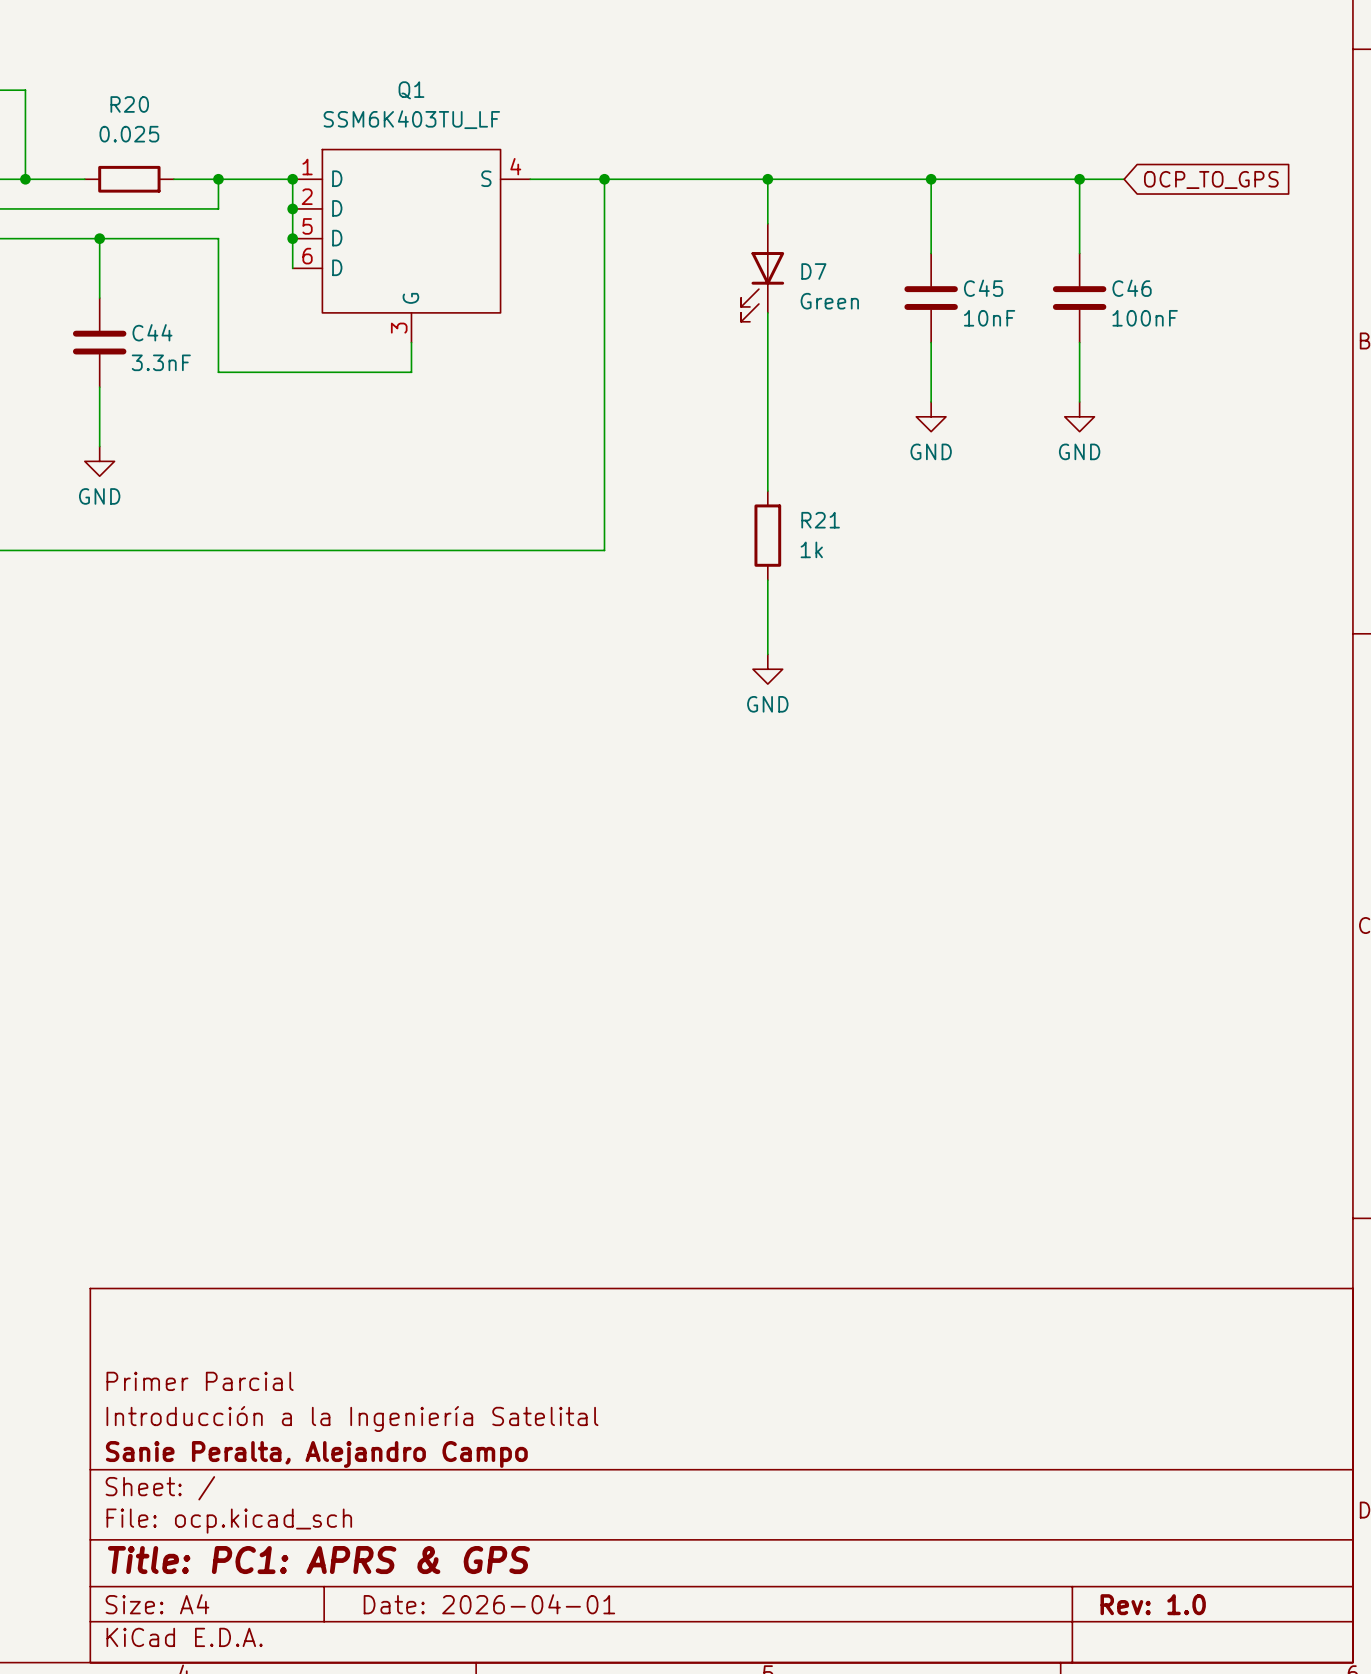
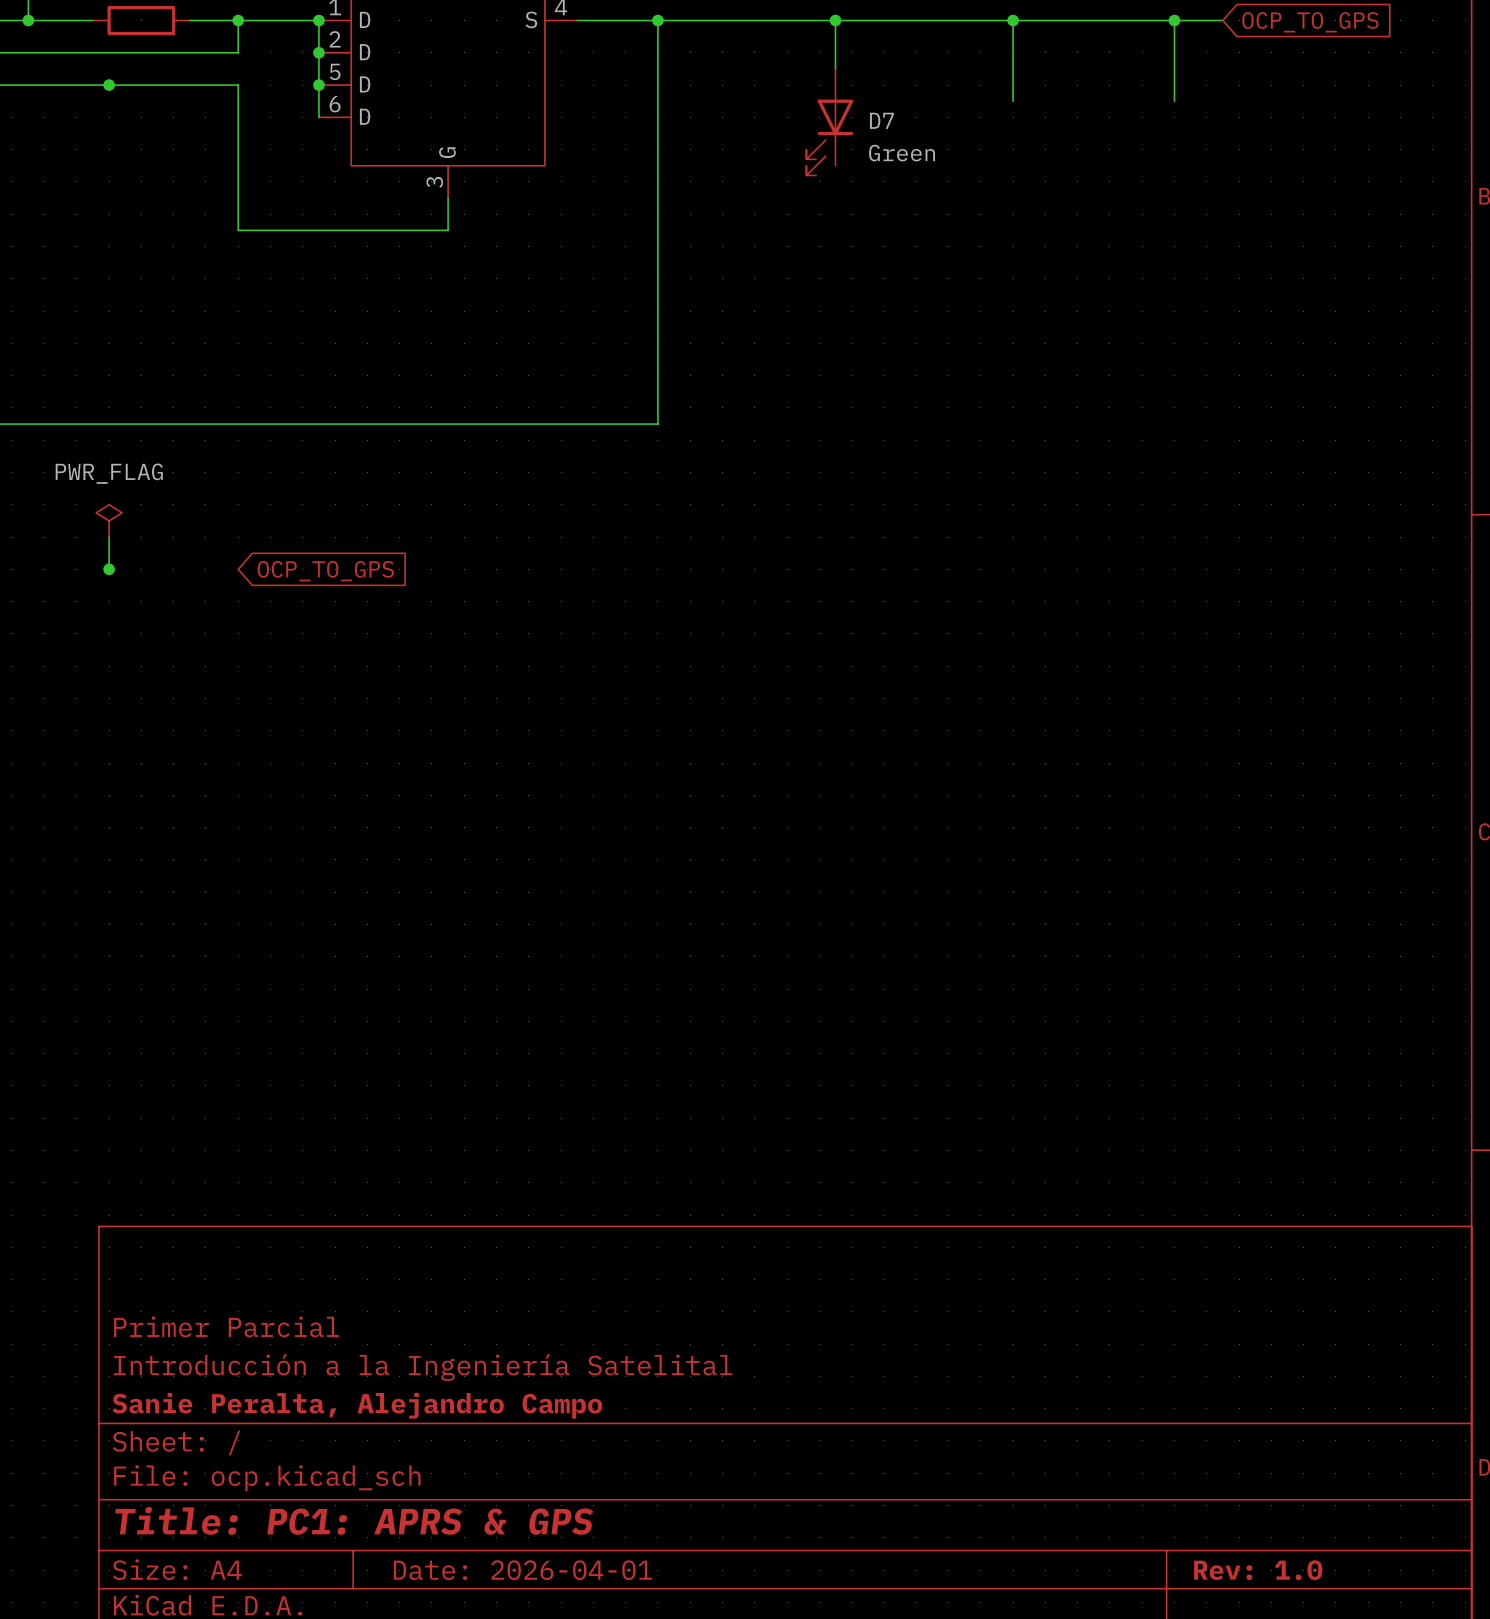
wire: (99, 238) (99, 298) -> none
C45: 10nF (931, 298) -> none
C46: 100nF (1079, 298) -> none
wire: (767, 312) (767, 491) -> none
C44: 3.3nF (99, 342) -> none
wire: (931, 342) (931, 401) -> none
wire: (1079, 342) (1079, 401) -> none
wire: (99, 387) (99, 446) -> none
power symbol: GND (931, 416) -> none
power symbol: GND (1079, 416) -> none
power symbol: GND (99, 461) -> none
R21: 1k (767, 535) -> none
wire: (767, 580) (767, 654) -> none
power symbol: none -> PWR_FLAG (109, 520)
wire: none -> (109, 537) (109, 569)
power symbol: GND (767, 669) -> none
junction: none -> (109, 569)
global label: none -> OCP_TO_GPS (325, 571)

